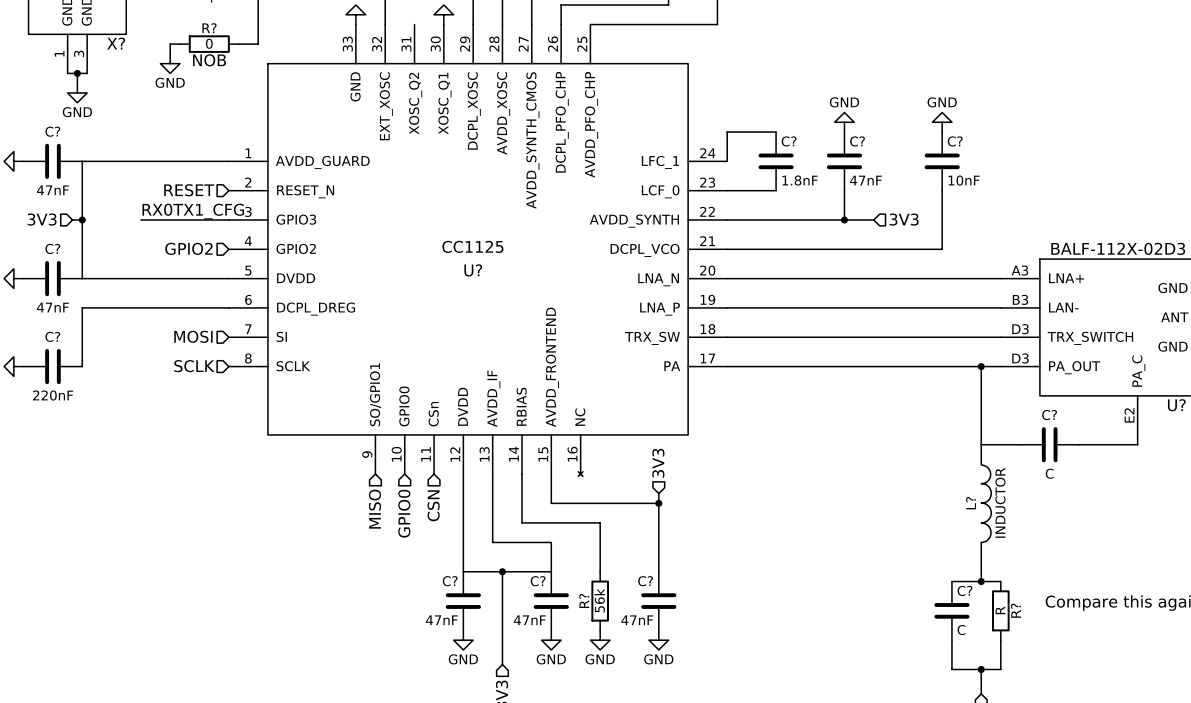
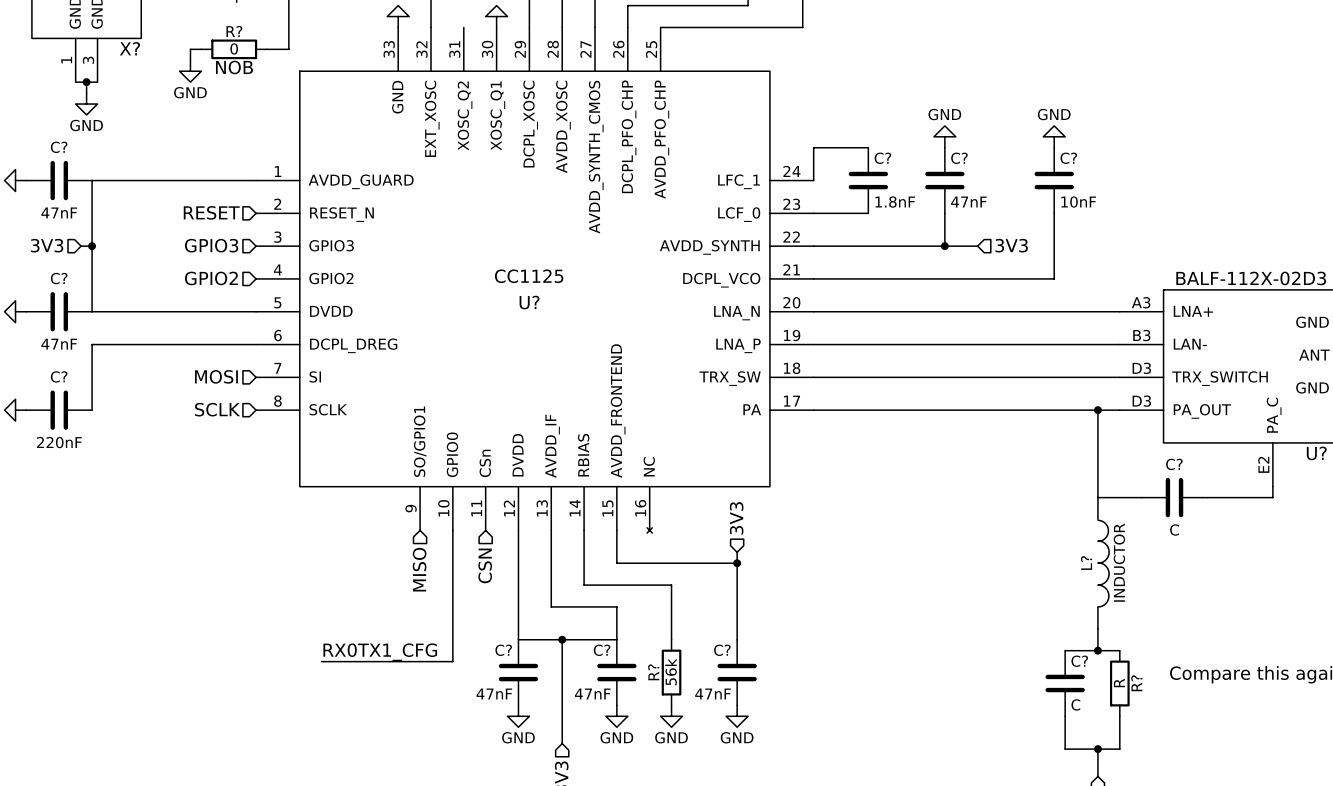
label: RX0TX1_CFG (193, 211) -> none
wire: (140, 219) (228, 219) -> none
hierarchical label: none -> GPIO3 (211, 245)
wire: none -> (452, 530) (452, 661) (321, 661)
hierarchical label: GPIO0 (404, 513) -> none
label: none -> RX0TX1_CFG (380, 652)

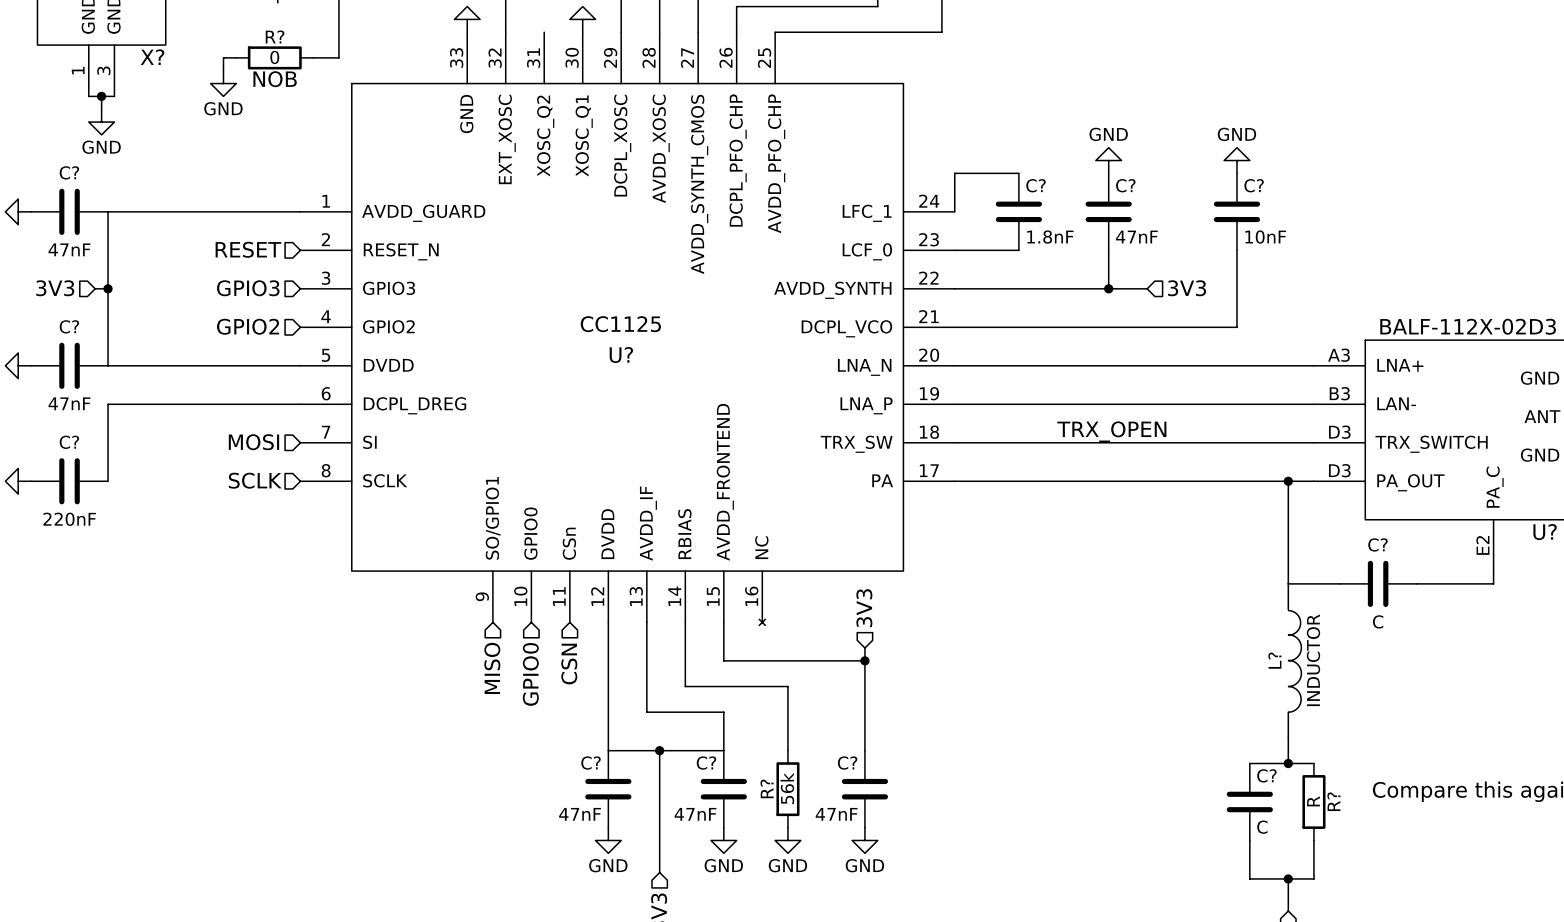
label: none -> TRX_OPEN (1111, 431)
wire: (452, 530) (452, 661) (321, 661) -> none
hierarchical label: none -> GPIO0 (530, 674)
label: RX0TX1_CFG (380, 652) -> none

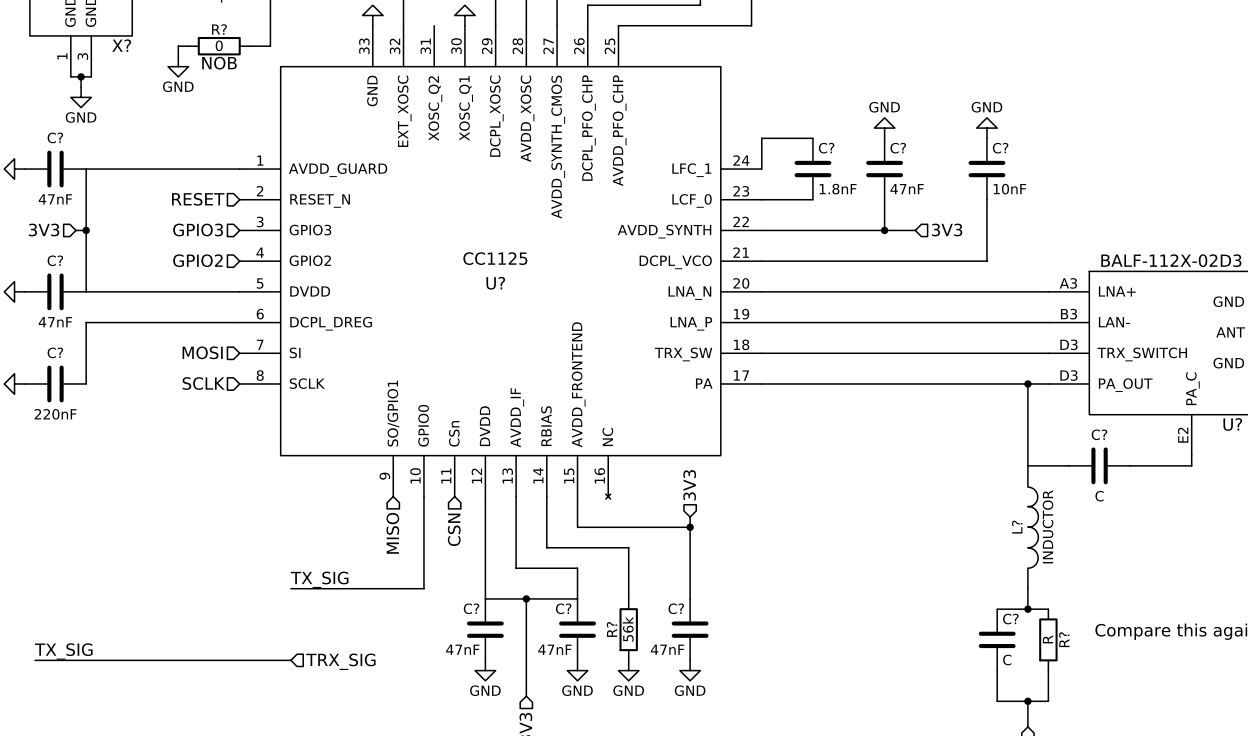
label: TRX_OPEN (1111, 431) -> none
wire: none -> (423, 496) (423, 588) (290, 588)
hierarchical label: GPIO0 (530, 674) -> none
label: none -> TX_SIG (319, 579)
label: none -> TX_SIG (63, 651)
wire: none -> (35, 660) (290, 660)
hierarchical label: none -> TRX_SIG (340, 661)

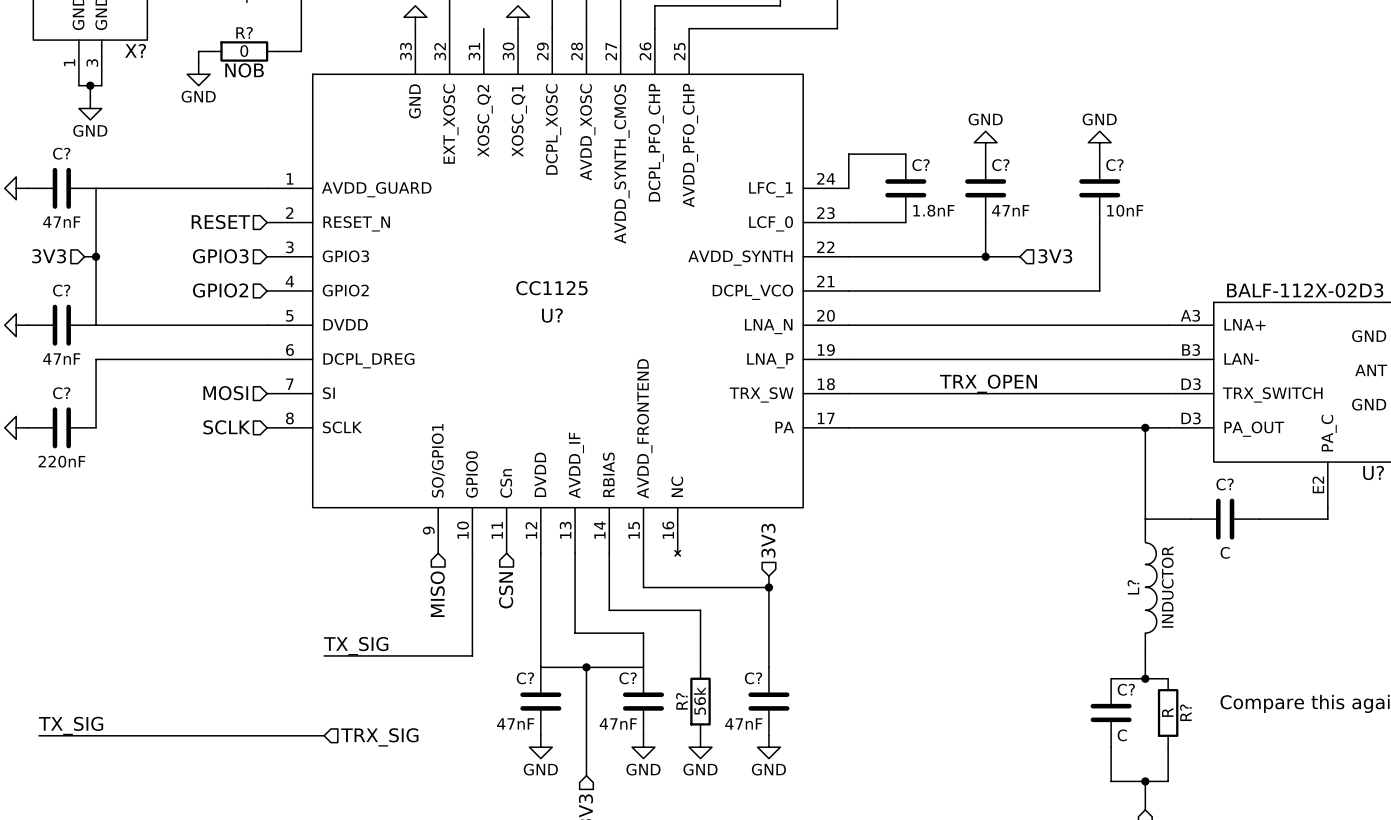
label: none -> TRX_OPEN (988, 383)

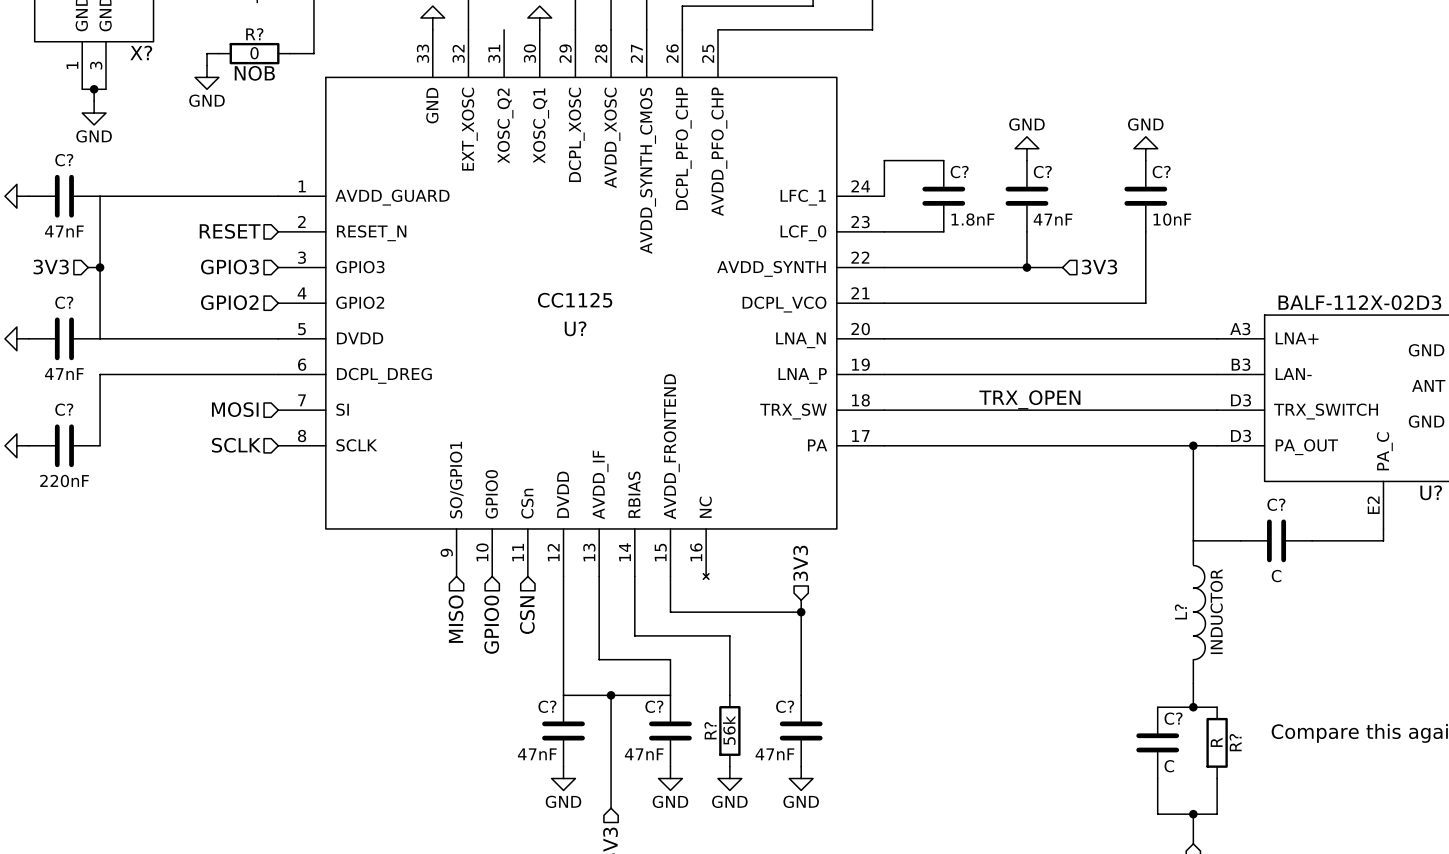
wire: (472, 553) (472, 655) (324, 655) -> none
hierarchical label: none -> GPIO0 (491, 624)
label: TX_SIG (356, 646) -> none
label: TX_SIG (71, 725) -> none
wire: (39, 735) (324, 735) -> none
hierarchical label: TRX_SIG (379, 737) -> none

